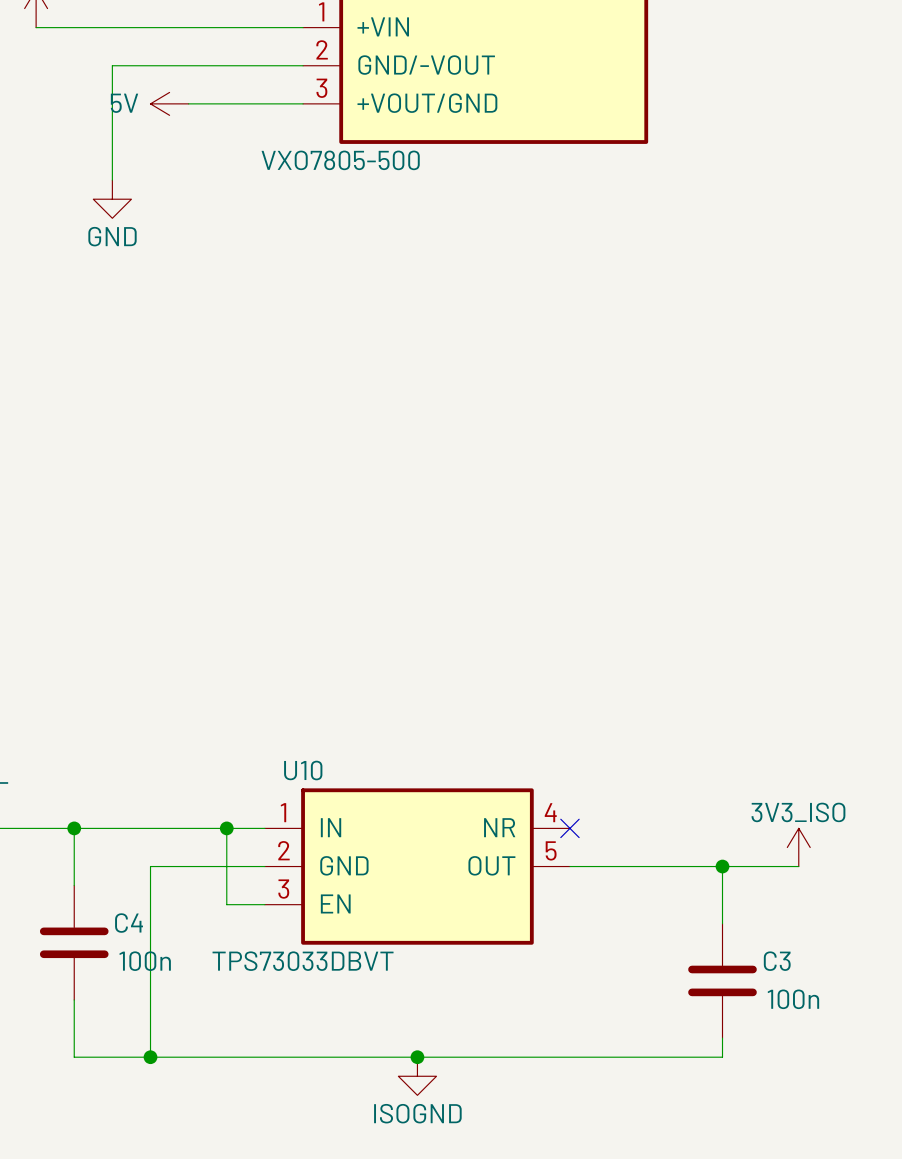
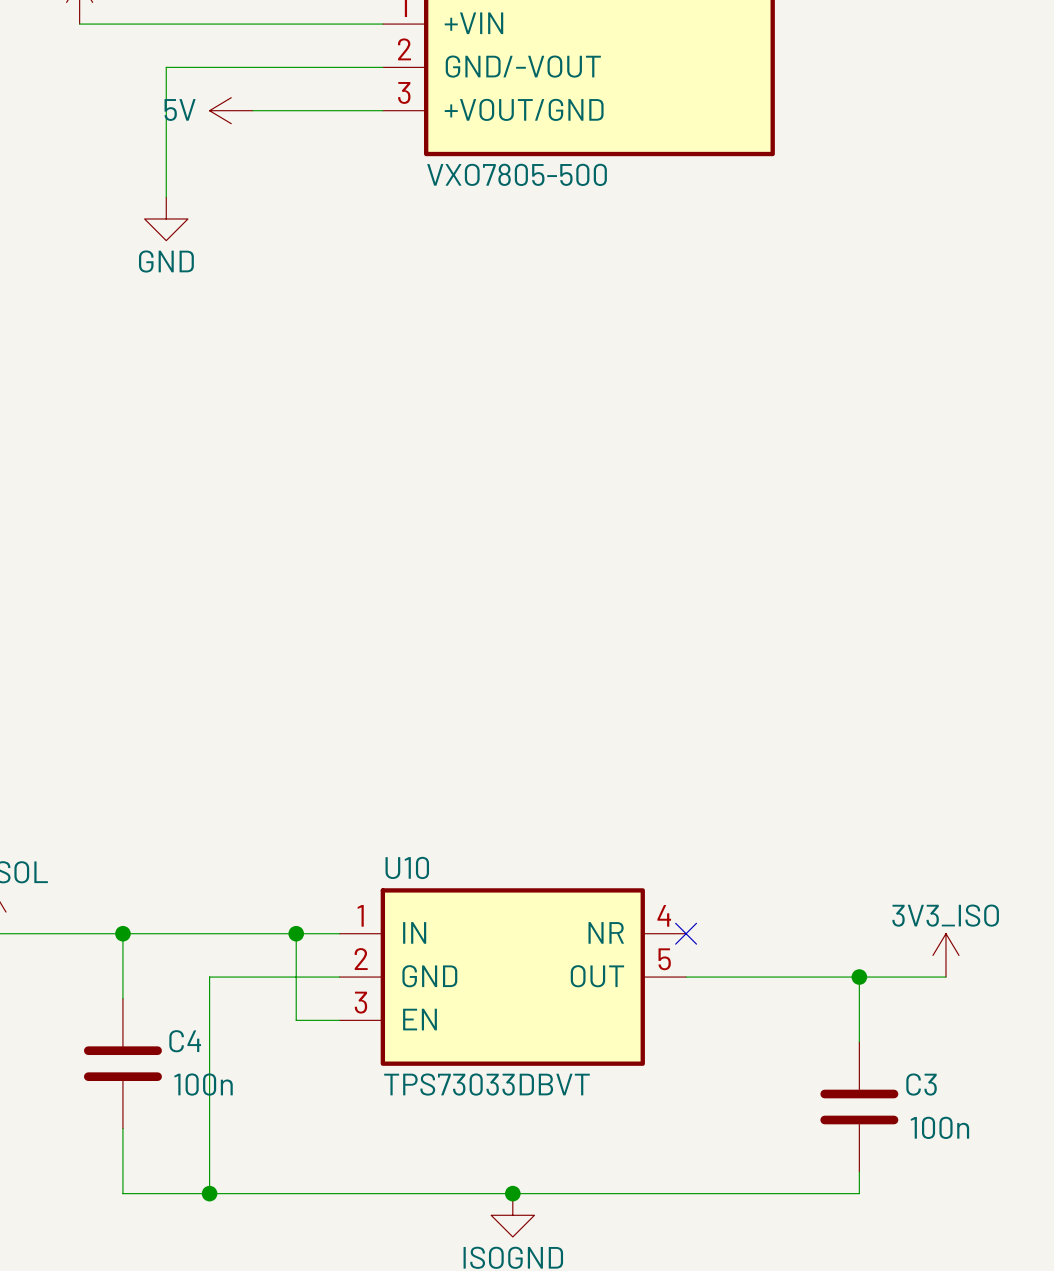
part value position: VXO7805-500 (340, 160) -> VXO7805-500 (517, 174)
U10 name position: U10 (303, 770) -> U10 (407, 867)
U10 value position: TPS73033DBVT (303, 961) -> TPS73033DBVT (486, 1084)

